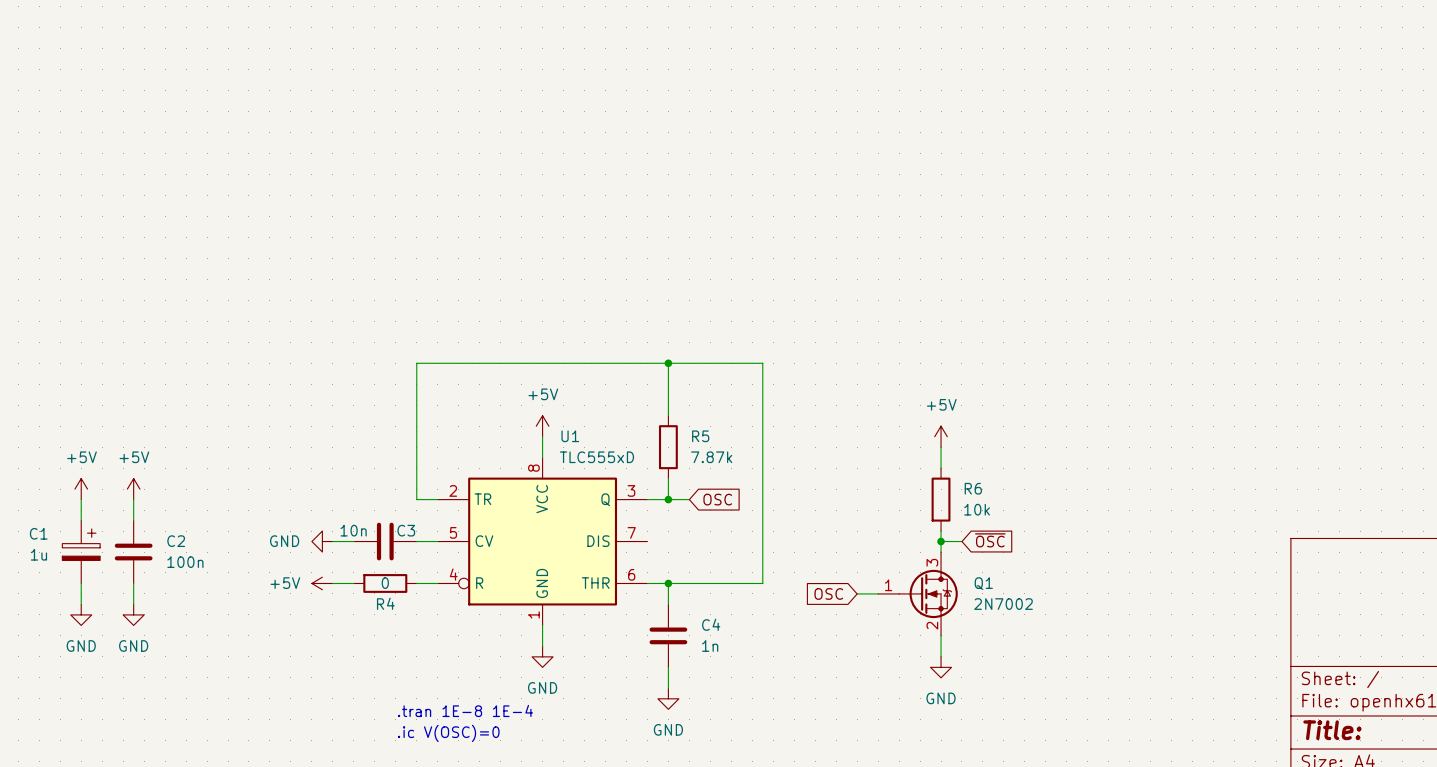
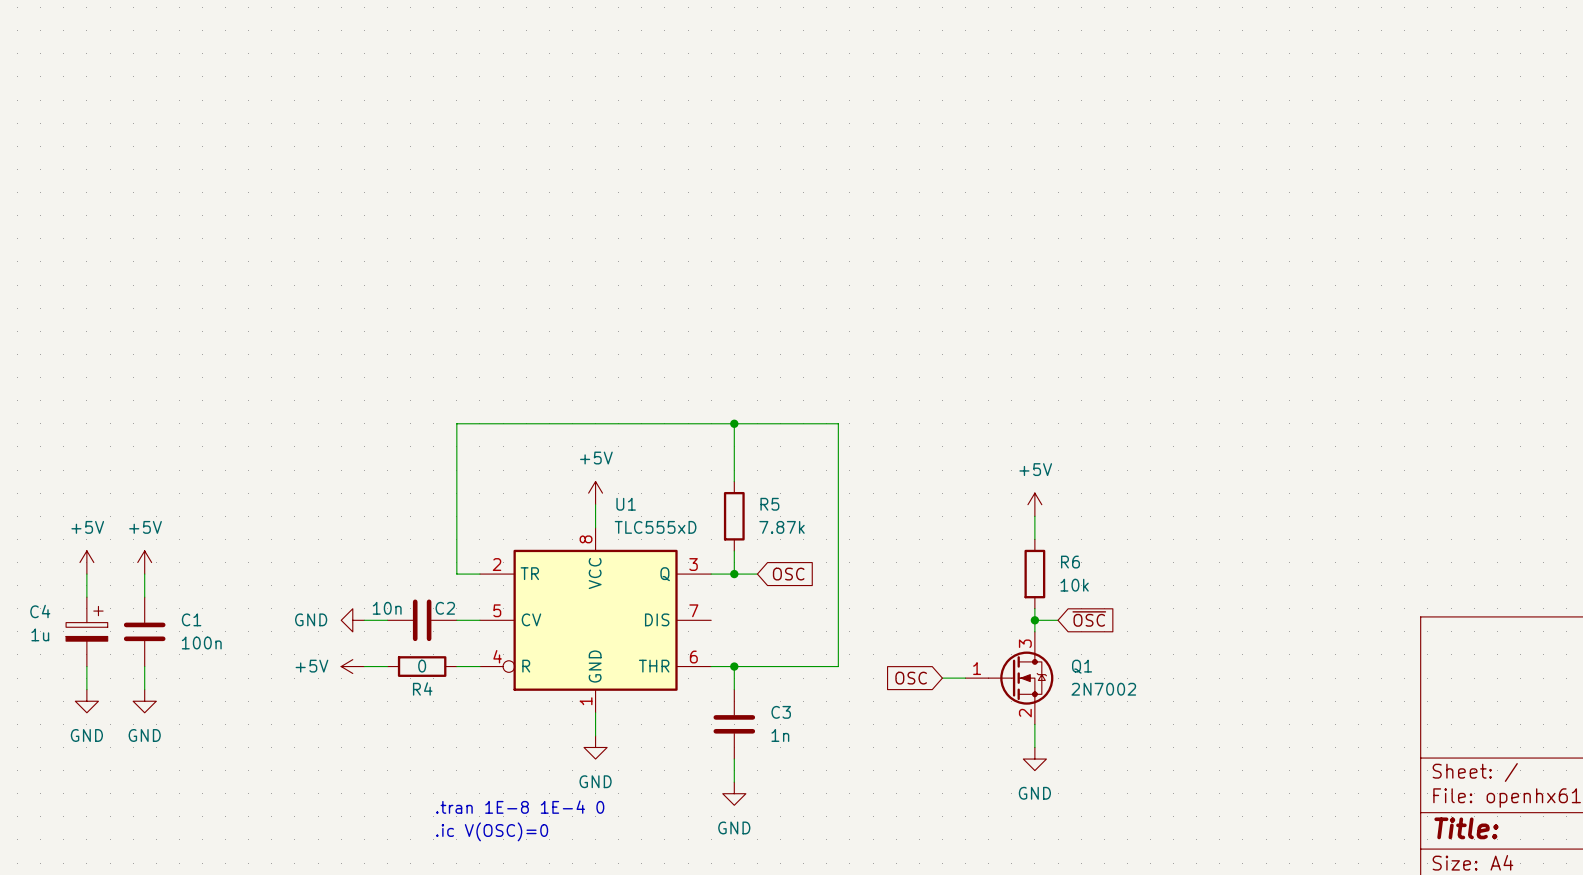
C3 name: C3 (406, 530) -> C2 (445, 608)
C1 name: C1 (38, 533) -> C4 (40, 611)
C2 name: C2 (176, 541) -> C1 (191, 619)
C4 name: C4 (711, 624) -> C3 (781, 712)
text: .tran 1E-8 1E-4 (465, 710) -> .tran 1E-8 1E-4 0 (520, 807)

